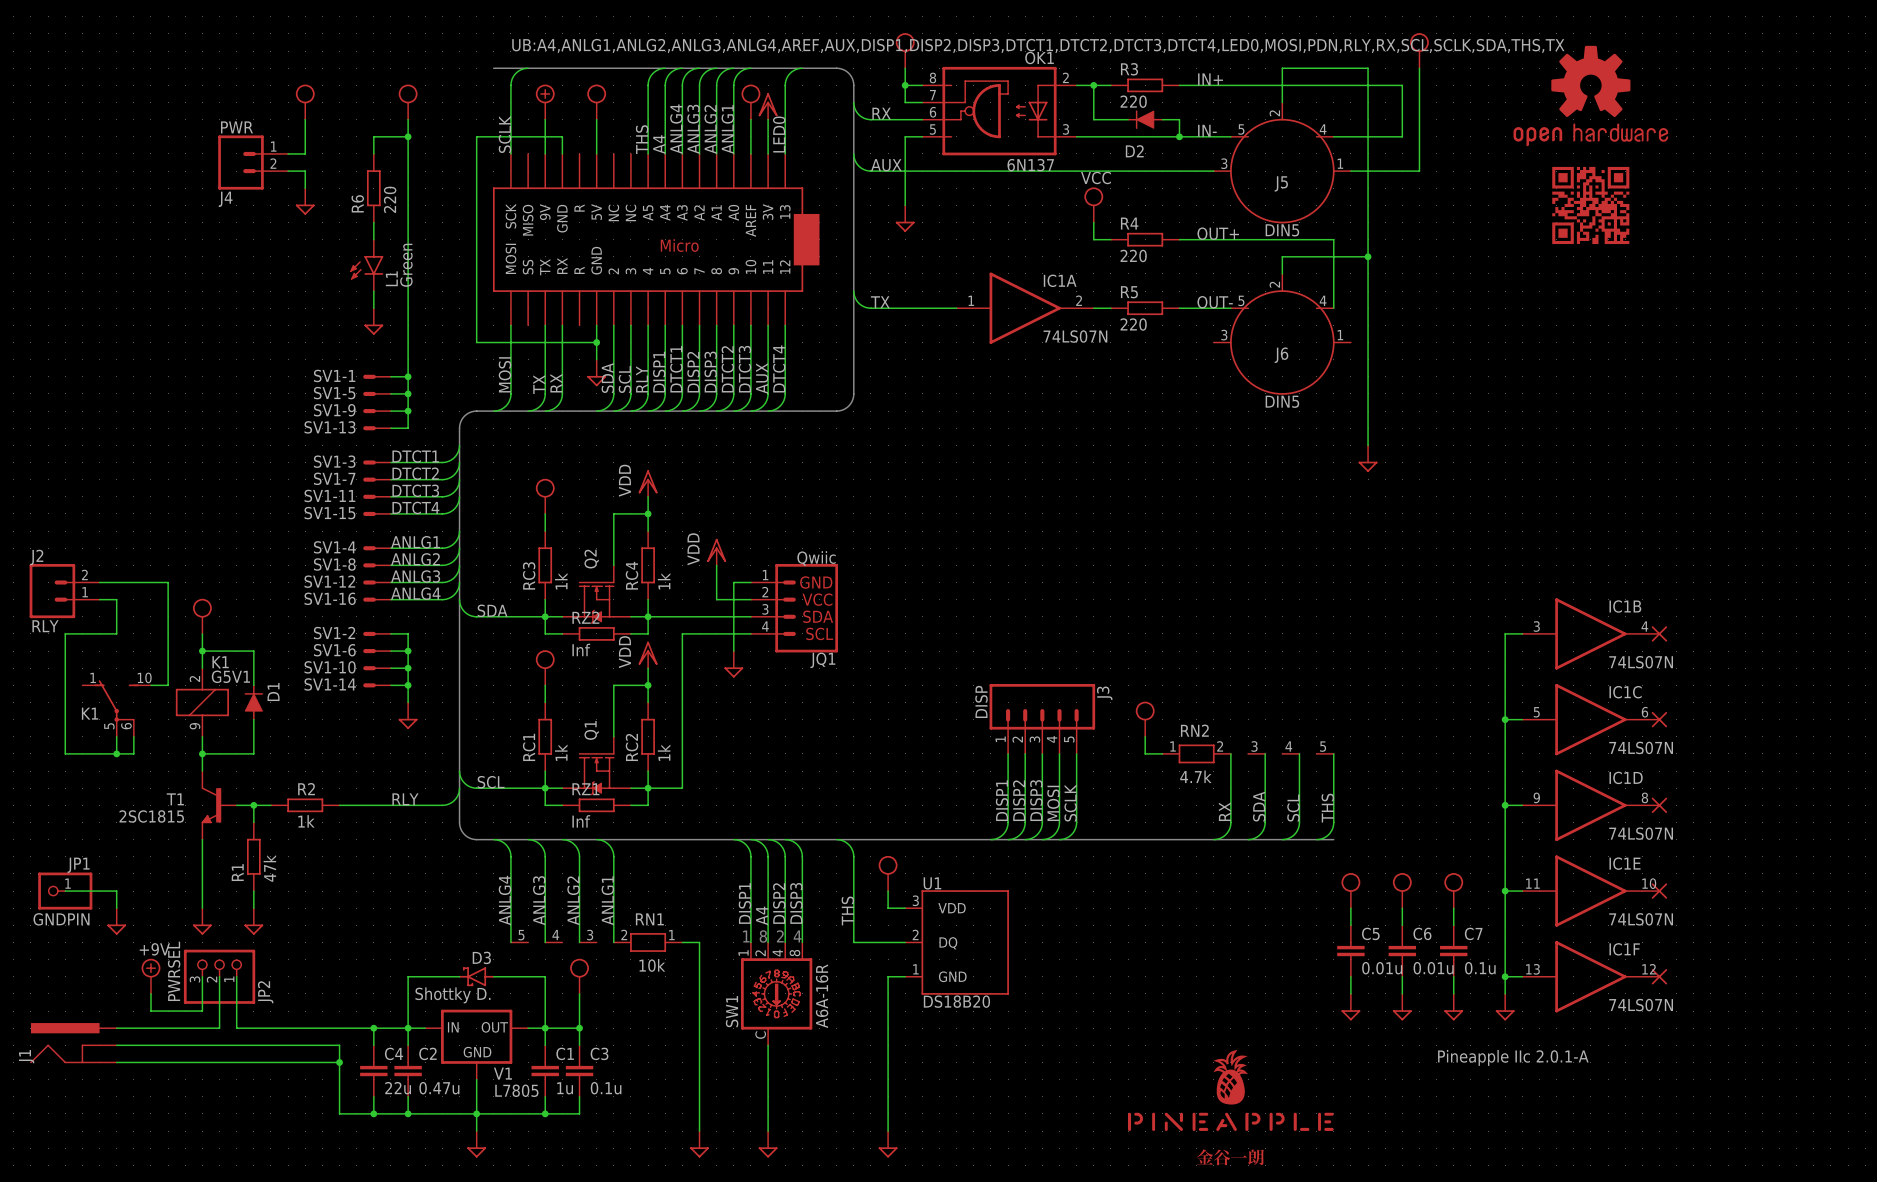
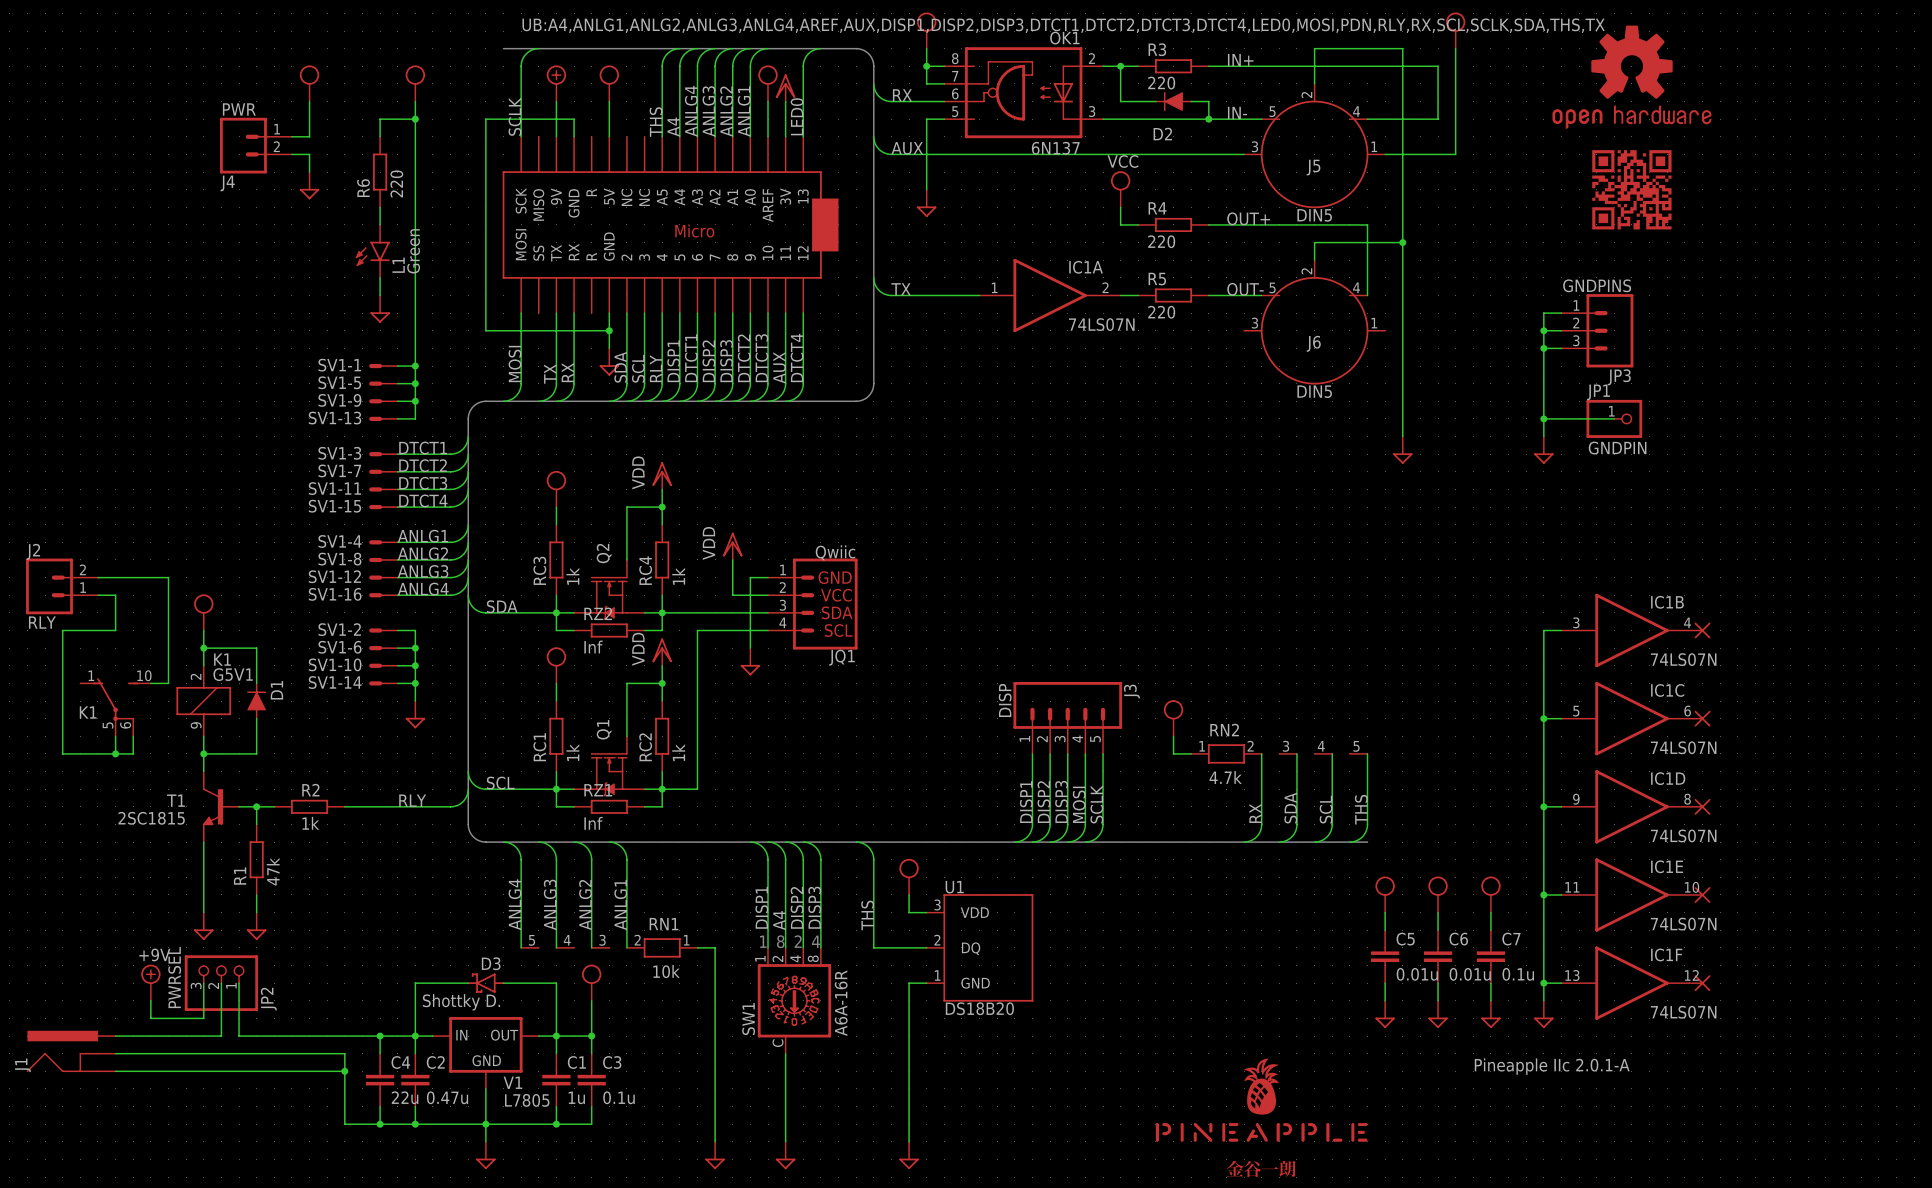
wire: none -> (1561, 313) (1543, 313) (1543, 436)
wire: none -> (1543, 330) (1561, 330)
junction: none -> (1543, 330)
JP3: none -> GNDPINS (1597, 330)
wire: none -> (1543, 348) (1561, 348)
junction: none -> (1543, 348)
wire: none -> (1543, 418) (1614, 418)
junction: none -> (1543, 418)
power symbol: none -> (1543, 450)
JP1 name position: JP1 (78, 865) -> JP1 (1598, 392)
wire: (65, 891) (116, 891) (116, 908) -> none
JP1 rotation: 0° (65, 891) -> 180° (1614, 418)
JP1 position: (65, 891) -> (1614, 418)
JP1 value position: GNDPIN (61, 919) -> GNDPIN (1617, 448)
power symbol: (116, 921) -> none

